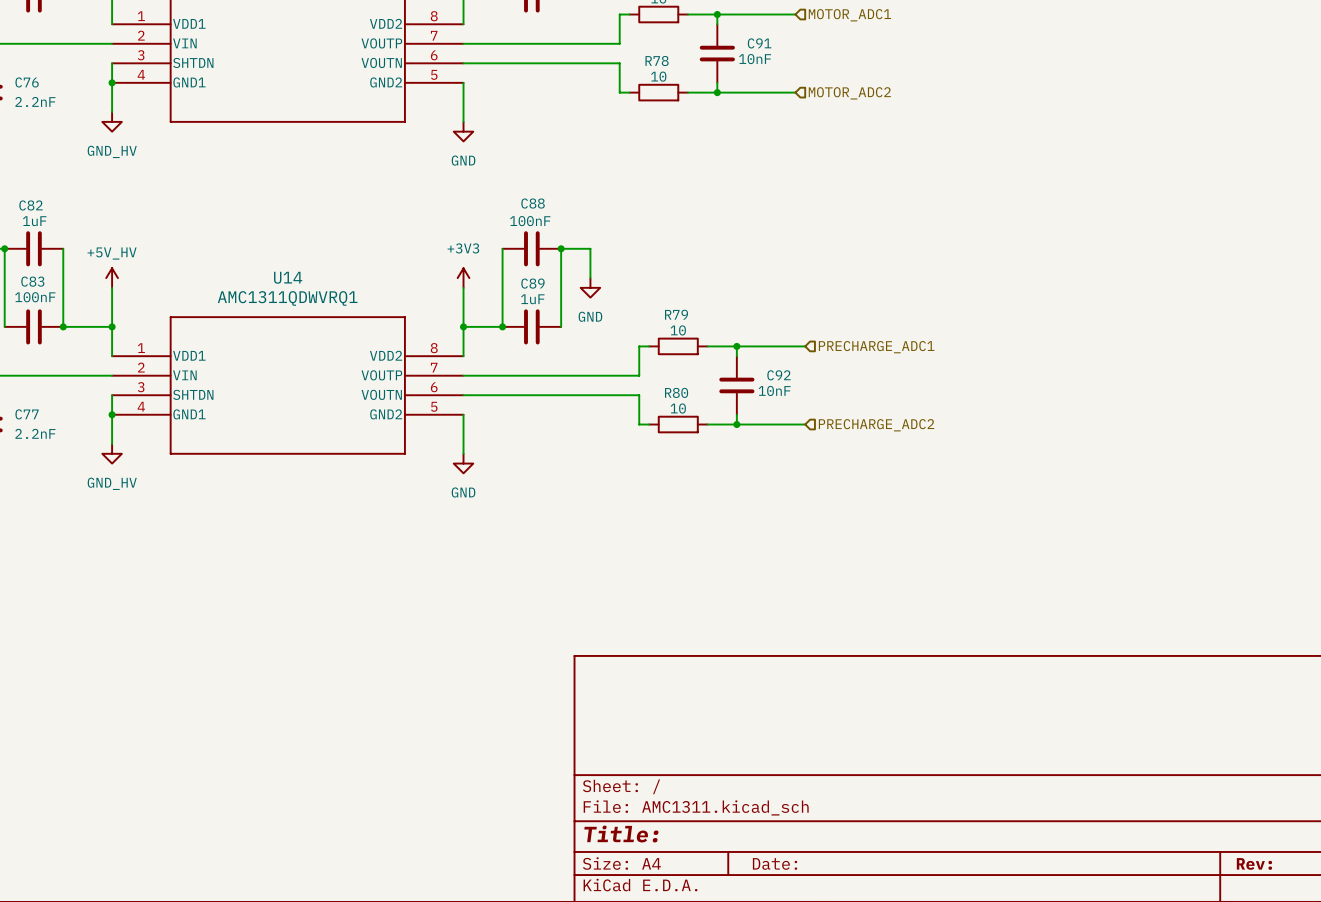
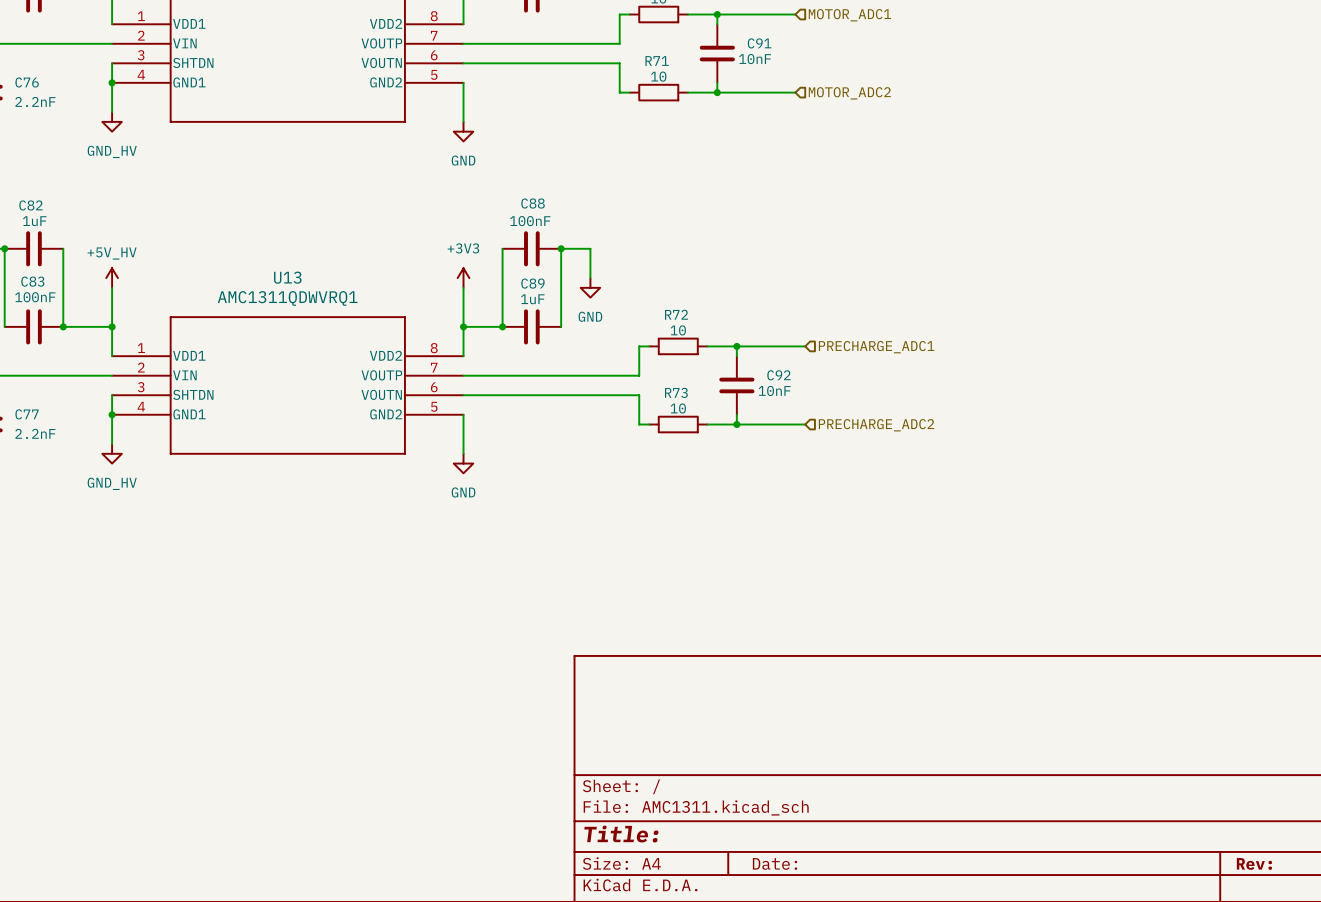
R78 name: R78 (657, 61) -> R71 (657, 61)
U14 name: U14 (288, 277) -> U13 (287, 277)
R79 name: R79 (676, 314) -> R72 (676, 314)
R80 name: R80 (676, 392) -> R73 (676, 392)

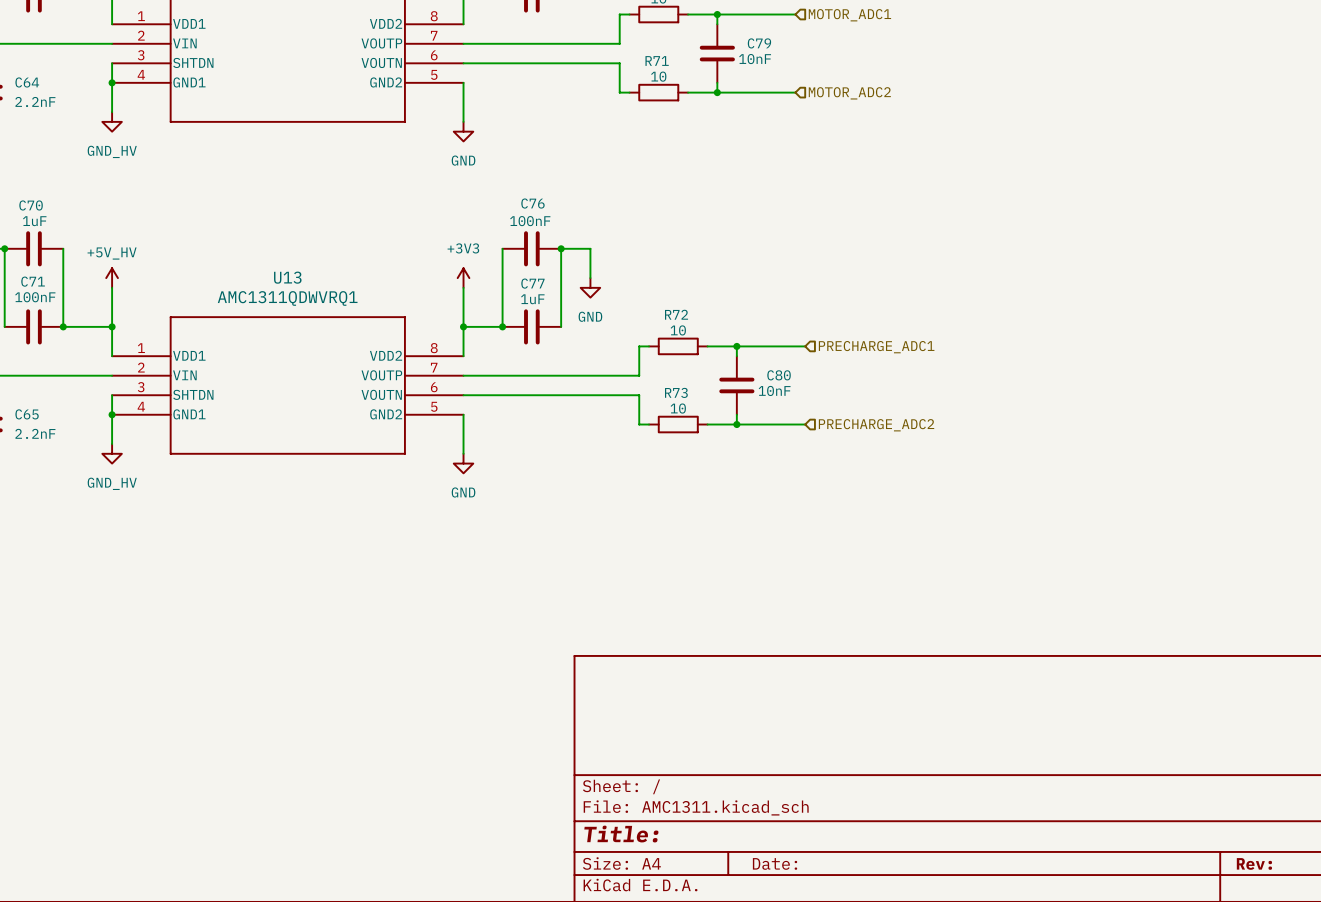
C91 name: C91 (759, 43) -> C79 (759, 43)
C76 name: C76 (27, 82) -> C64 (27, 82)
C88 name: C88 (533, 203) -> C76 (532, 203)
C82 name: C82 (31, 205) -> C70 (31, 205)
C83 name: C83 (32, 281) -> C71 (33, 281)
C89 name: C89 (532, 283) -> C77 (532, 283)
C92 name: C92 (778, 375) -> C80 (779, 375)
C77 name: C77 (27, 414) -> C65 (27, 414)

